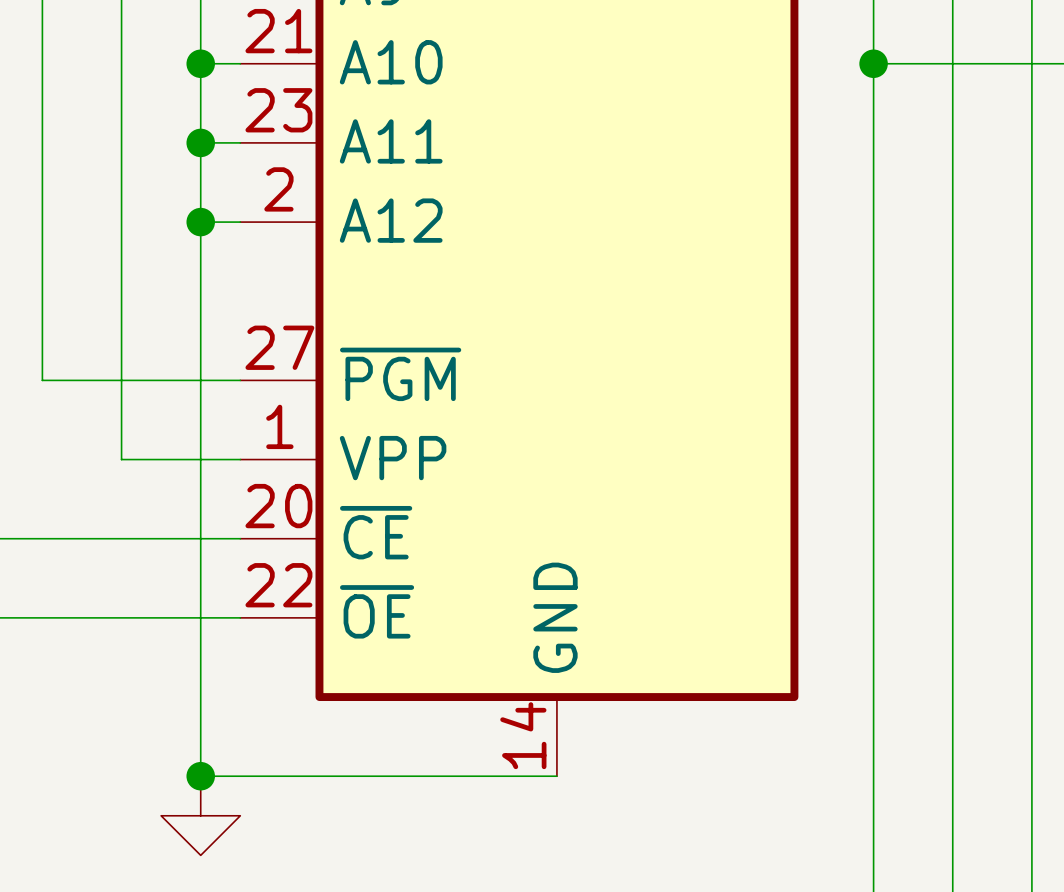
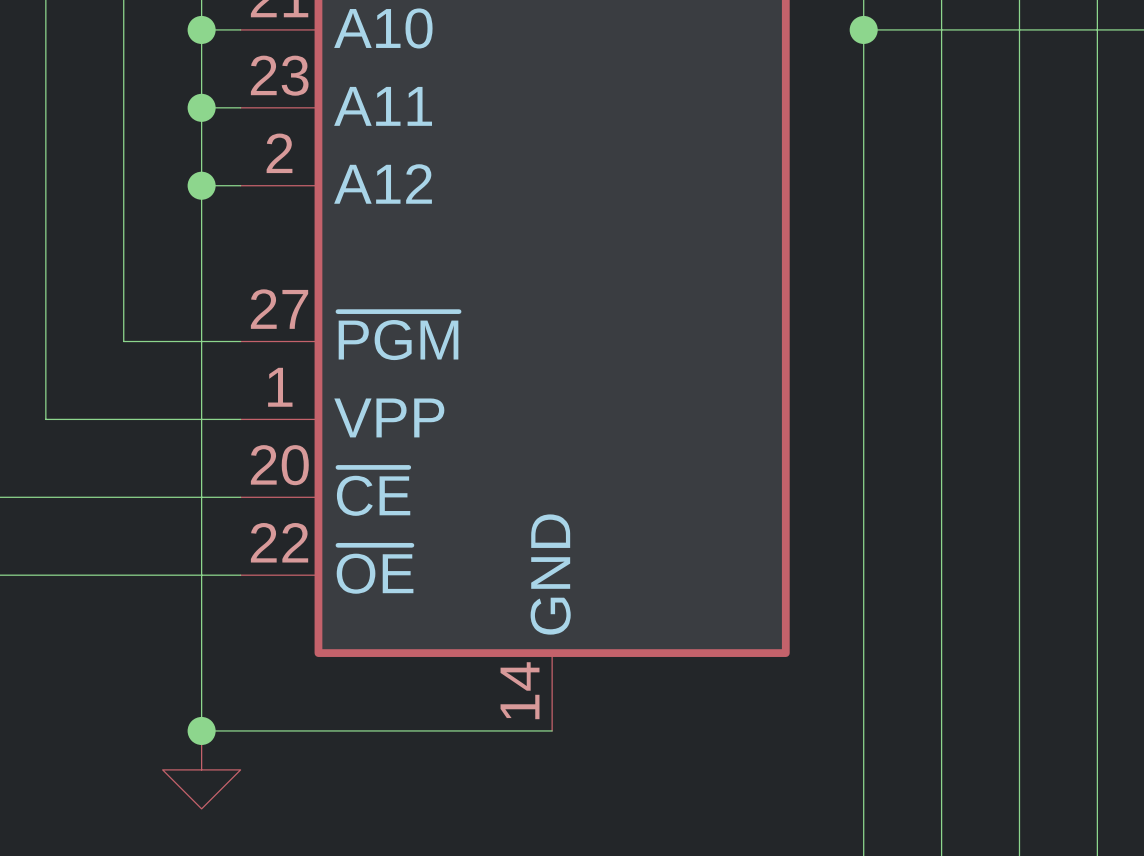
wire: (42, 380) (121, 380) (121, 459) -> (45, 341) (45, 419) (123, 419)

